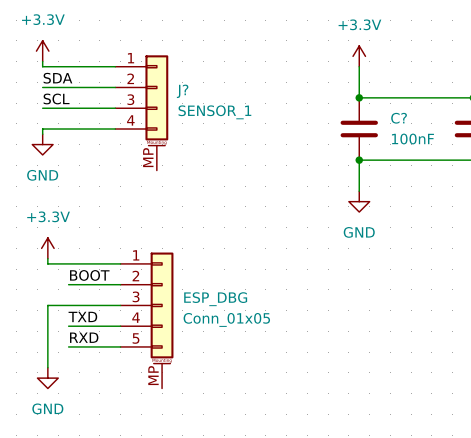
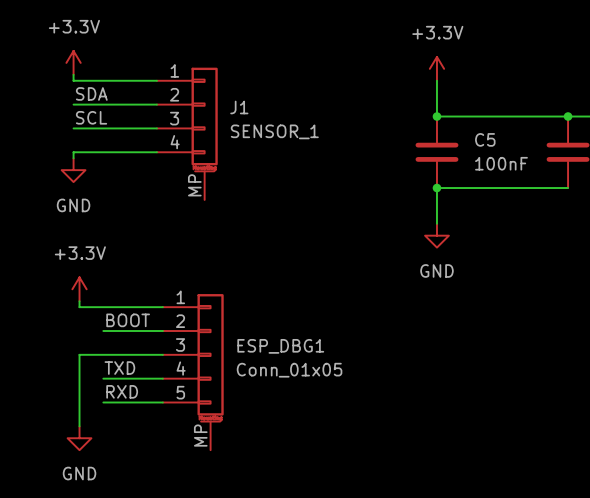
J? name: J? (182, 91) -> J1 (239, 107)
C? name: C? (399, 118) -> C5 (485, 139)
ESP_DBG name: ESP_DBG (215, 299) -> ESP_DBG1 (280, 346)

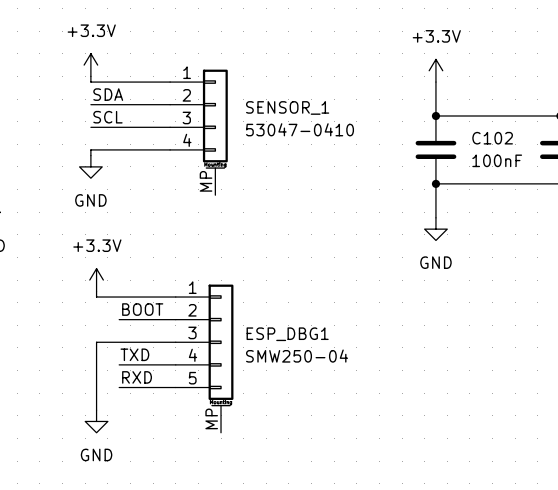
J1 name: J1 (239, 107) -> SENSOR_1 (287, 107)
J1 value: SENSOR_1 (274, 131) -> 53047-0410 (300, 129)
C5 name: C5 (485, 139) -> C102 (492, 138)
ESP_DBG1 value: Conn_01x05 (289, 370) -> SMW250-04 (297, 356)

